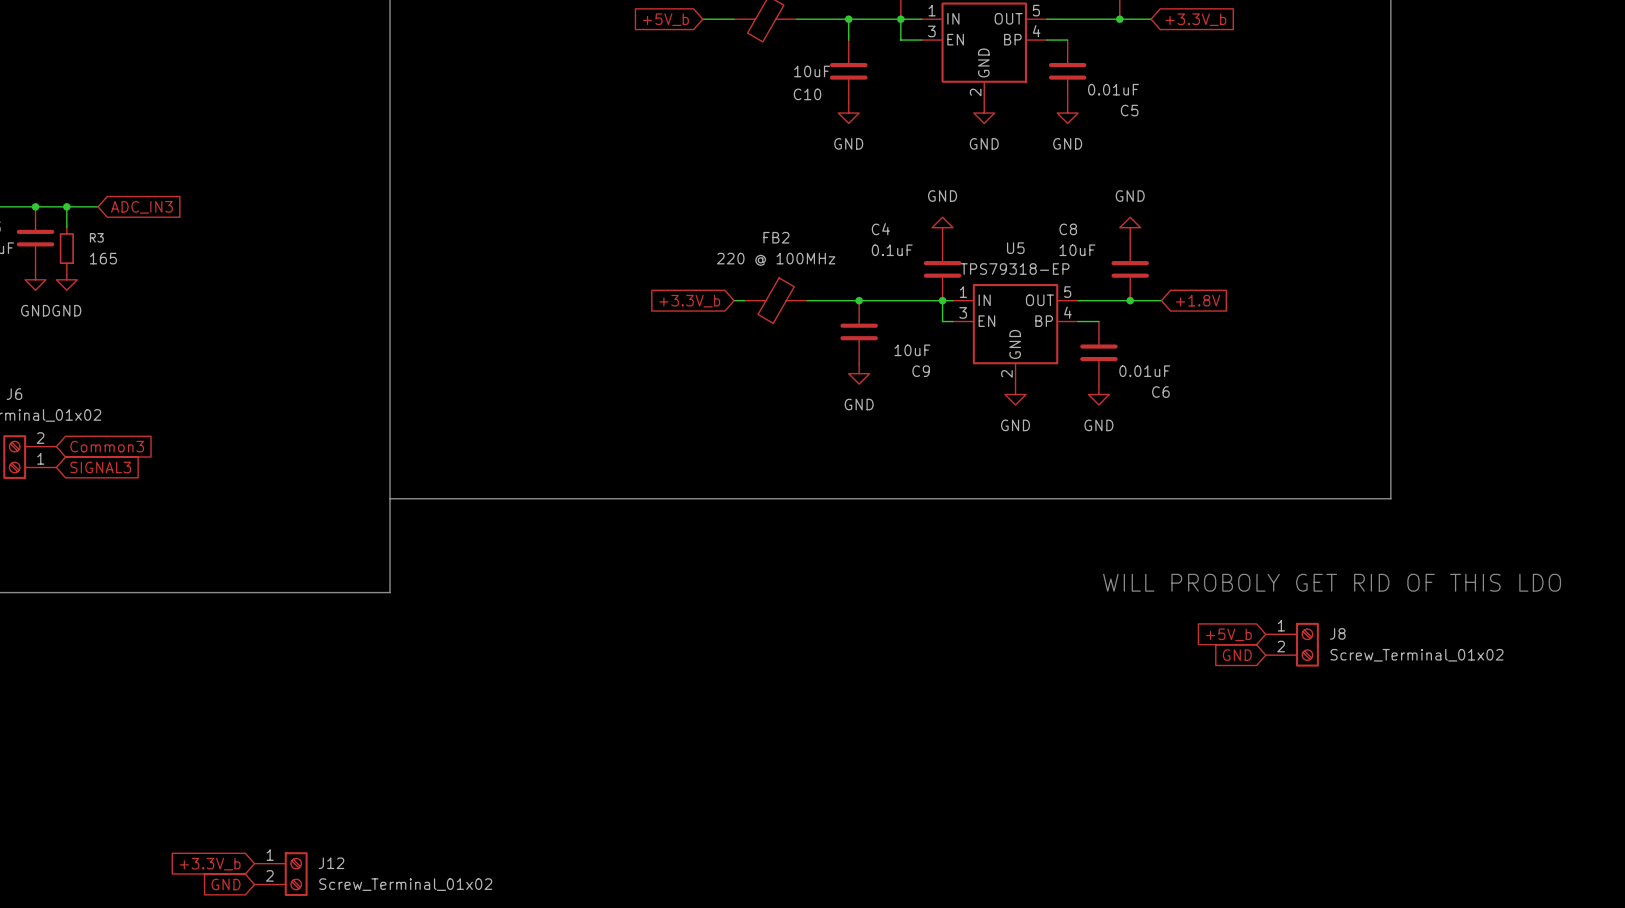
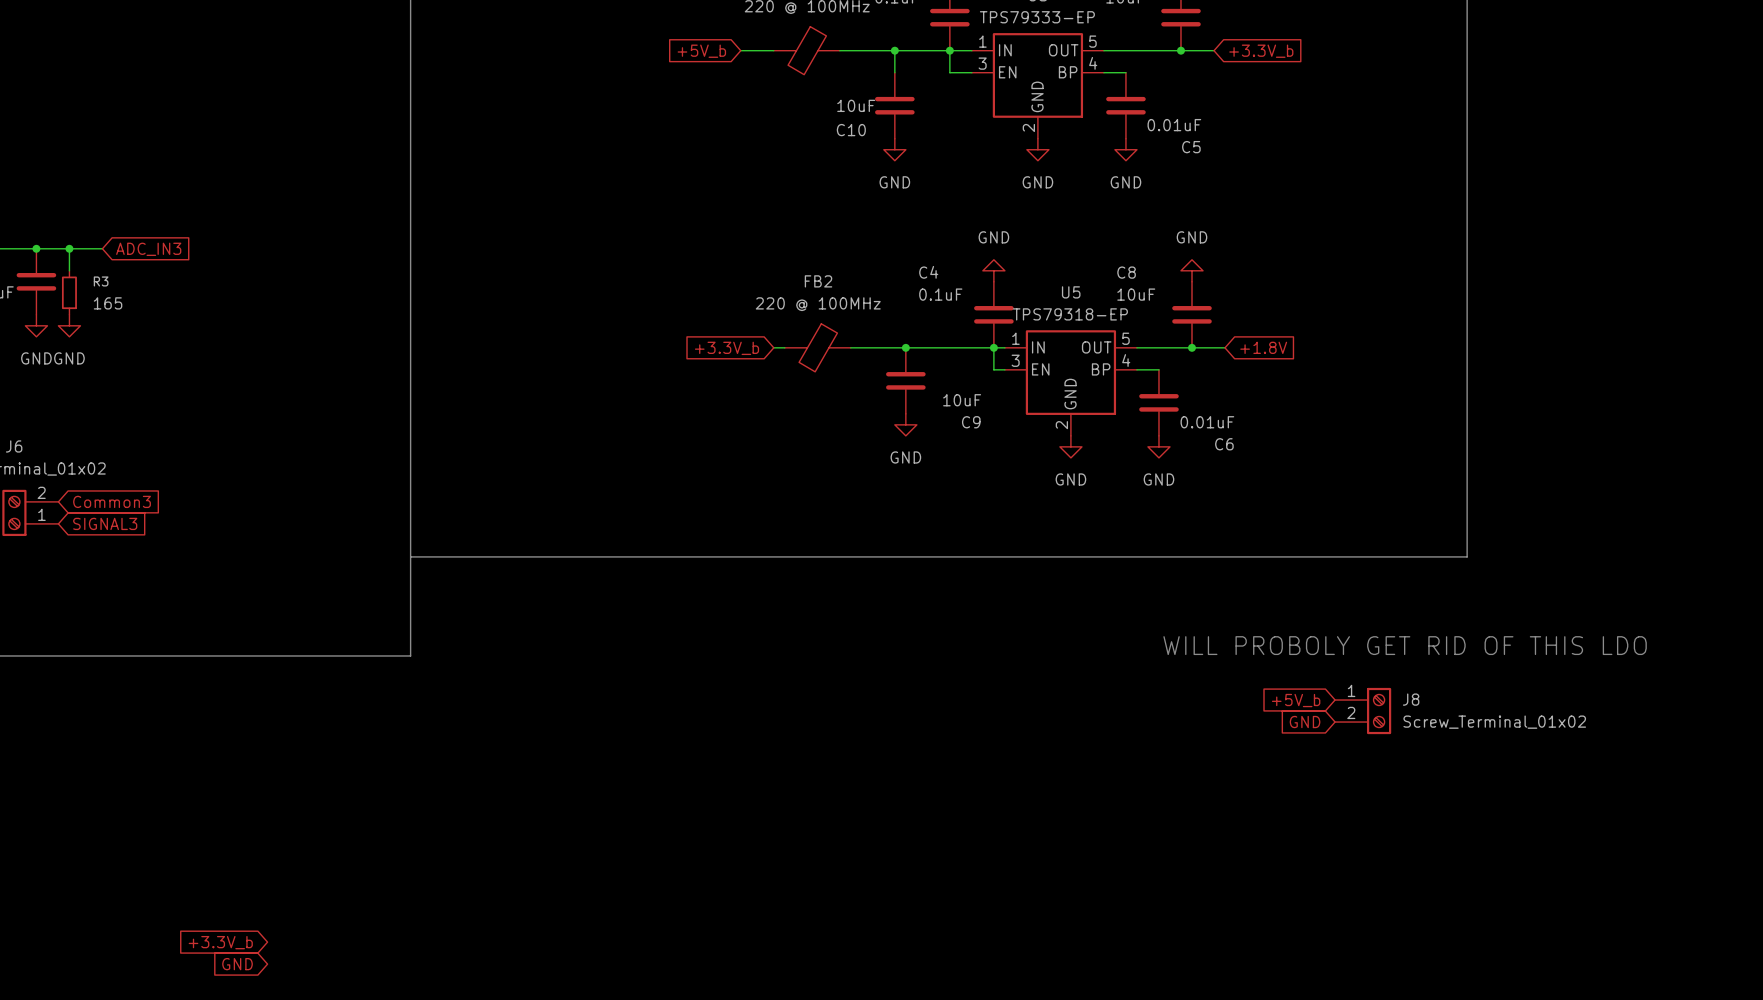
J12: Screw_Terminal_01x02 (281, 874) -> none

